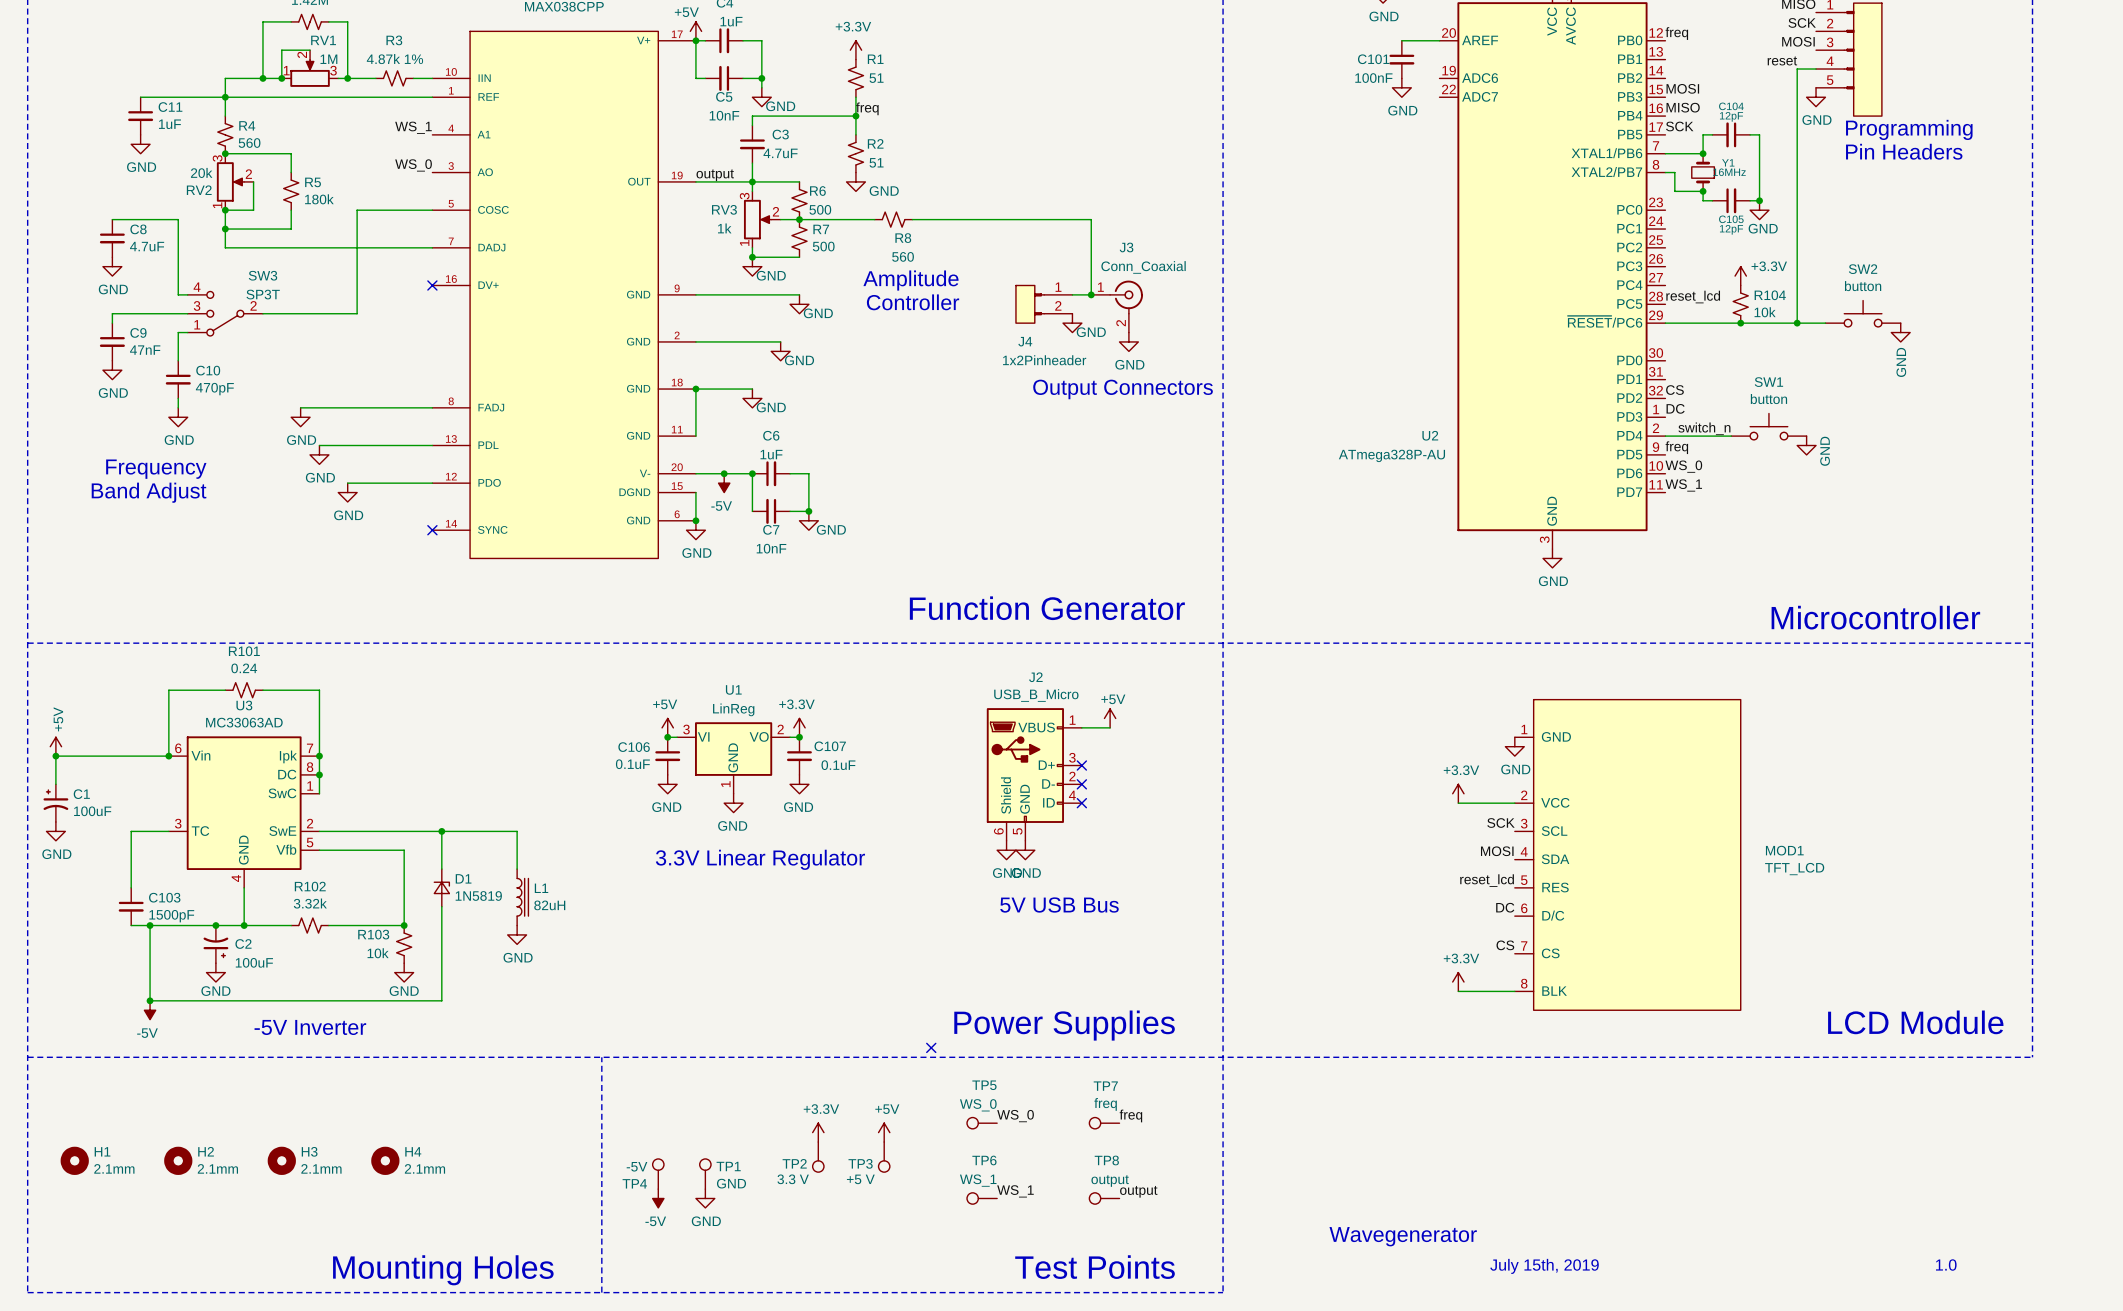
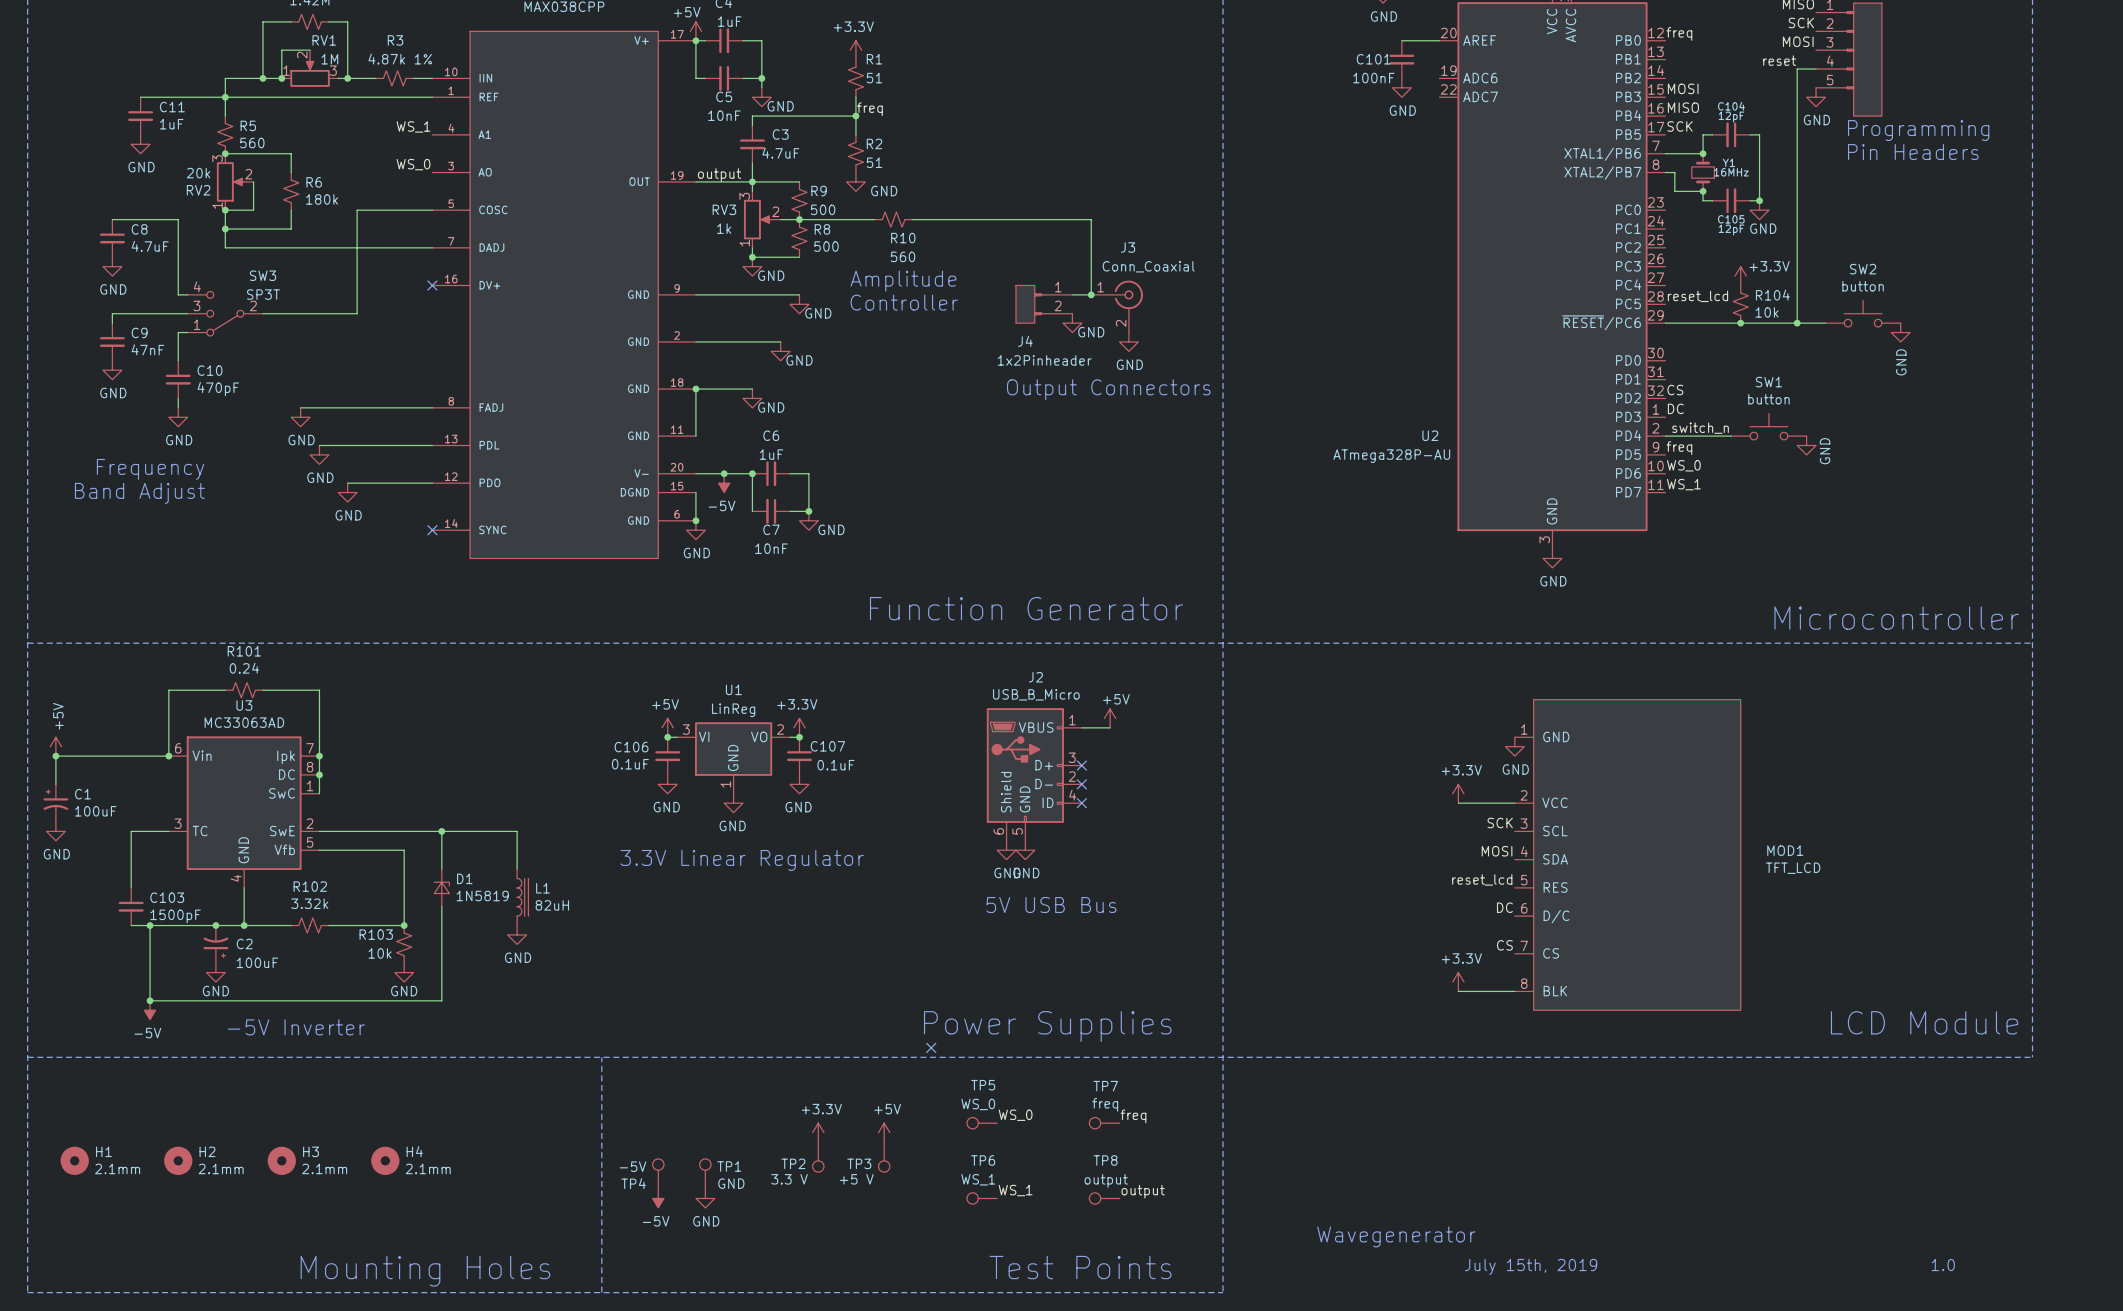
R4 name: R4 (247, 125) -> R5 (248, 125)
R5 name: R5 (313, 182) -> R6 (314, 182)
R6 name: R6 (817, 191) -> R9 (819, 191)
R7 name: R7 (821, 229) -> R8 (822, 229)
R8 name: R8 (903, 238) -> R10 (903, 238)

